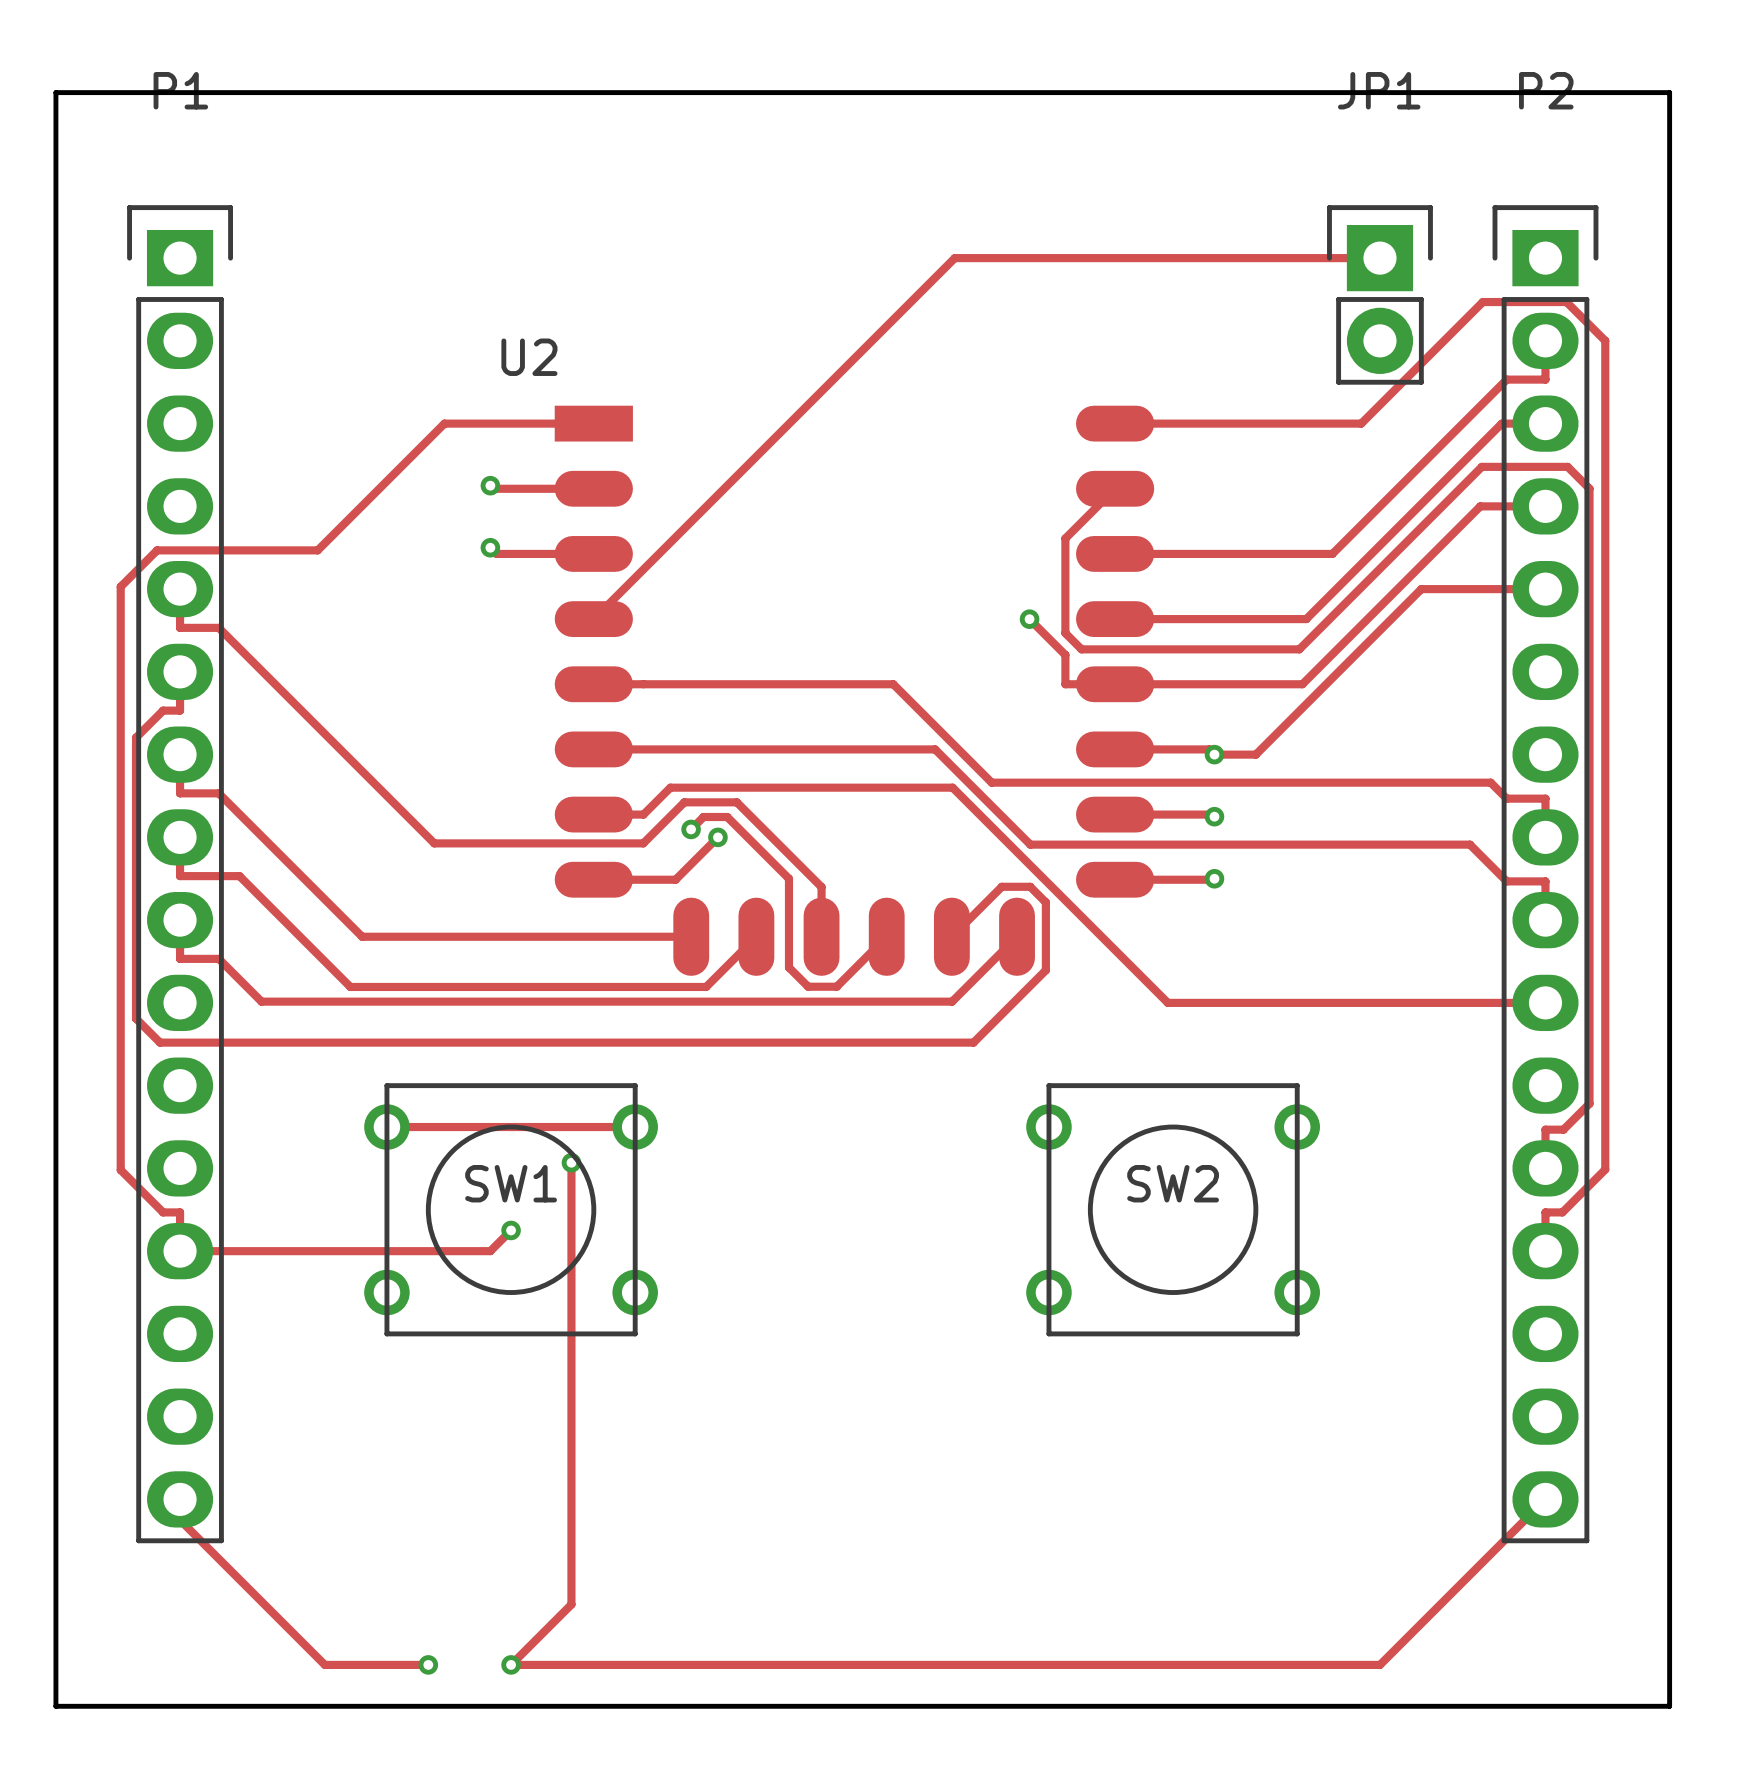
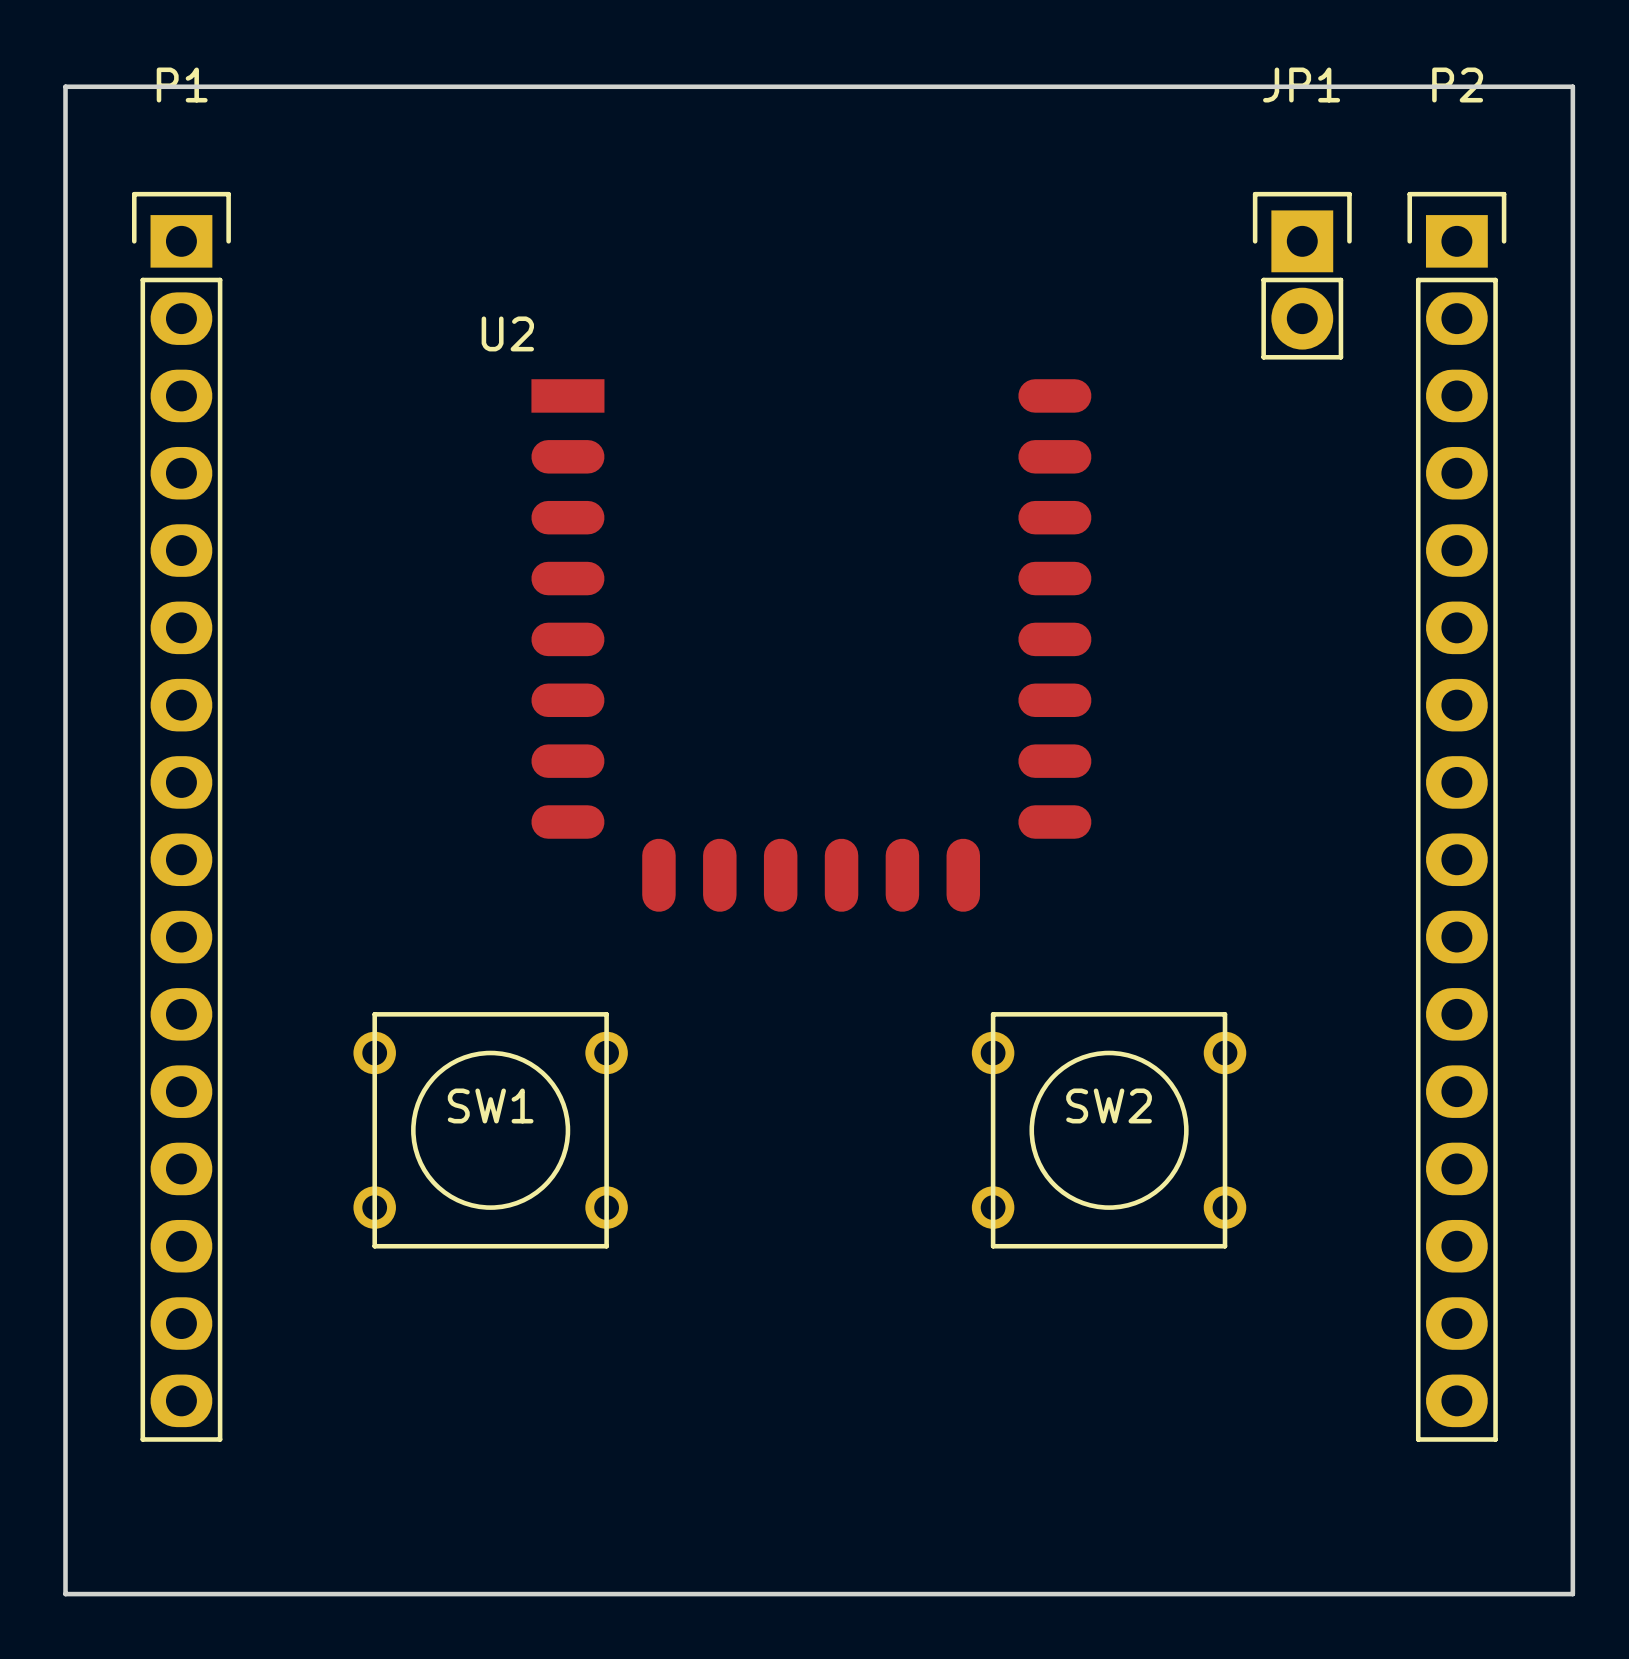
track: (1379, 258) (954, 258) (593, 619) -> none
track: (1545, 340) (1545, 379) (1506, 379) (1332, 553) (1115, 553) -> none
track: (593, 423) (444, 423) (317, 550) (157, 550) (120, 586) (120, 1170) (163, 1212) (180, 1212) (180, 1251) (490, 1251) (511, 1230) -> none
track: (1115, 423) (1361, 423) (1482, 302) (1566, 302) (1605, 340) (1605, 1169) (1562, 1212) (1545, 1212) (1545, 1251) -> none
track: (1545, 423) (1501, 423) (1306, 619) (1115, 619) -> none
track: (490, 485) (493, 488) (593, 488) -> none
via: (490, 485) -> none
track: (1115, 488) (1065, 538) (1065, 633) (1081, 649) (1299, 649) (1481, 466) (1567, 466) (1589, 488) (1589, 1103) (1563, 1129) (1545, 1129) (1545, 1168) -> none
track: (1545, 506) (1480, 506) (1302, 684) (1065, 684) (1065, 655) (1029, 619) -> none
track: (490, 547) (496, 553) (593, 553) -> none
via: (490, 547) -> none
track: (180, 589) (180, 627) (218, 627) (434, 843) (643, 843) (684, 802) (736, 802) (821, 887) (821, 936) -> none
track: (1545, 589) (1421, 589) (1255, 754) (1214, 754) (1209, 749) (1115, 749) -> none
via: (1029, 619) -> none
track: (180, 671) (180, 710) (163, 710) (136, 737) (136, 1018) (160, 1042) (973, 1042) (1045, 970) (1045, 902) (1030, 886) (1001, 886) (951, 936) -> none
track: (593, 684) (893, 684) (991, 782) (1490, 782) (1506, 798) (1545, 798) (1545, 837) -> none
track: (593, 749) (935, 749) (1030, 844) (1469, 844) (1506, 881) (1545, 881) (1545, 920) -> none
track: (180, 754) (180, 793) (218, 793) (362, 936) (691, 936) -> none
via: (1214, 754) -> none
track: (593, 814) (643, 814) (670, 787) (952, 787) (1167, 1002) (1545, 1002) -> none
track: (1115, 814) (1212, 814) (1214, 816) -> none
via: (1214, 816) -> none
track: (691, 829) (703, 817) (727, 817) (788, 878) (788, 967) (808, 986) (836, 986) (886, 936) -> none
via: (691, 829) -> none
track: (180, 837) (180, 876) (239, 876) (350, 986) (706, 986) (756, 936) -> none
track: (717, 837) (675, 879) (593, 879) -> none
via: (717, 837) -> none
track: (1214, 878) (1115, 879) -> none
via: (1214, 878) -> none
track: (180, 920) (180, 958) (218, 958) (261, 1001) (952, 1001) (1017, 936) -> none
track: (386, 1127) (635, 1127) -> none
track: (571, 1162) (571, 1604) (511, 1664) (1379, 1664) (1545, 1499) -> none
via: (571, 1162) -> none
via: (511, 1230) -> none
track: (180, 1499) (180, 1520) (324, 1664) (428, 1664) -> none
via: (428, 1664) -> none
via: (511, 1664) -> none

